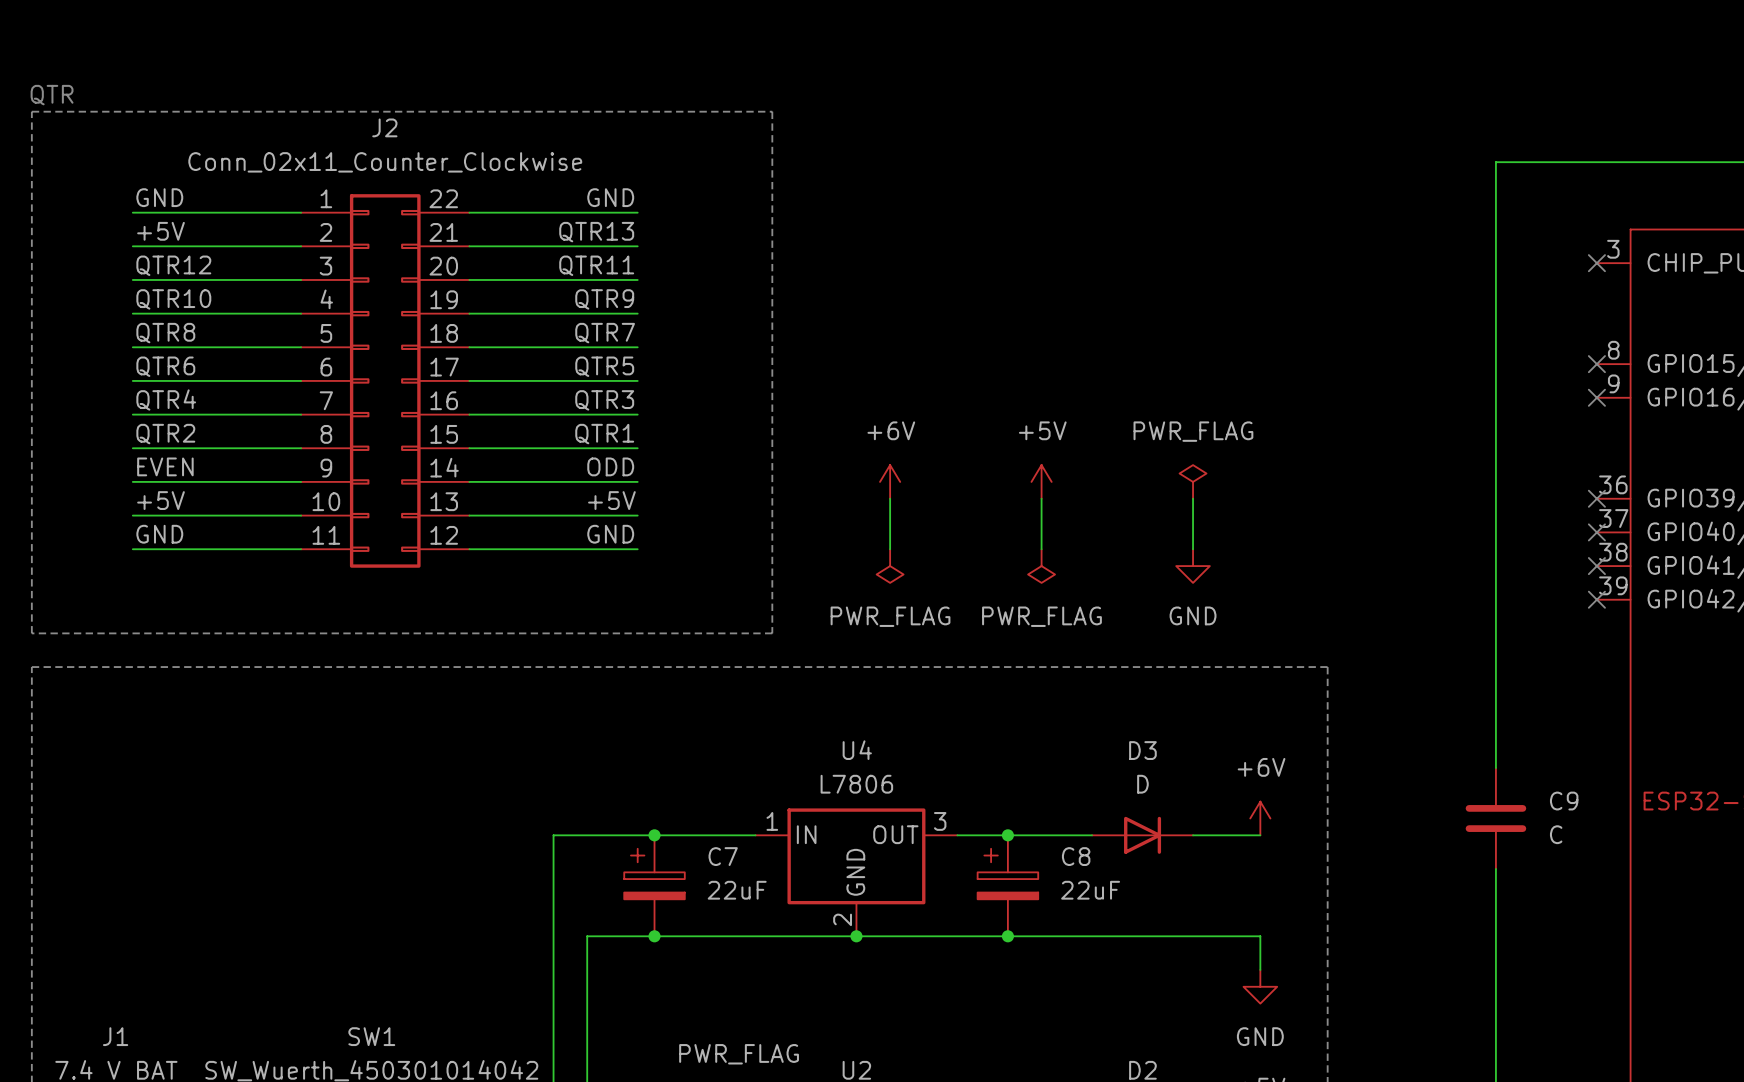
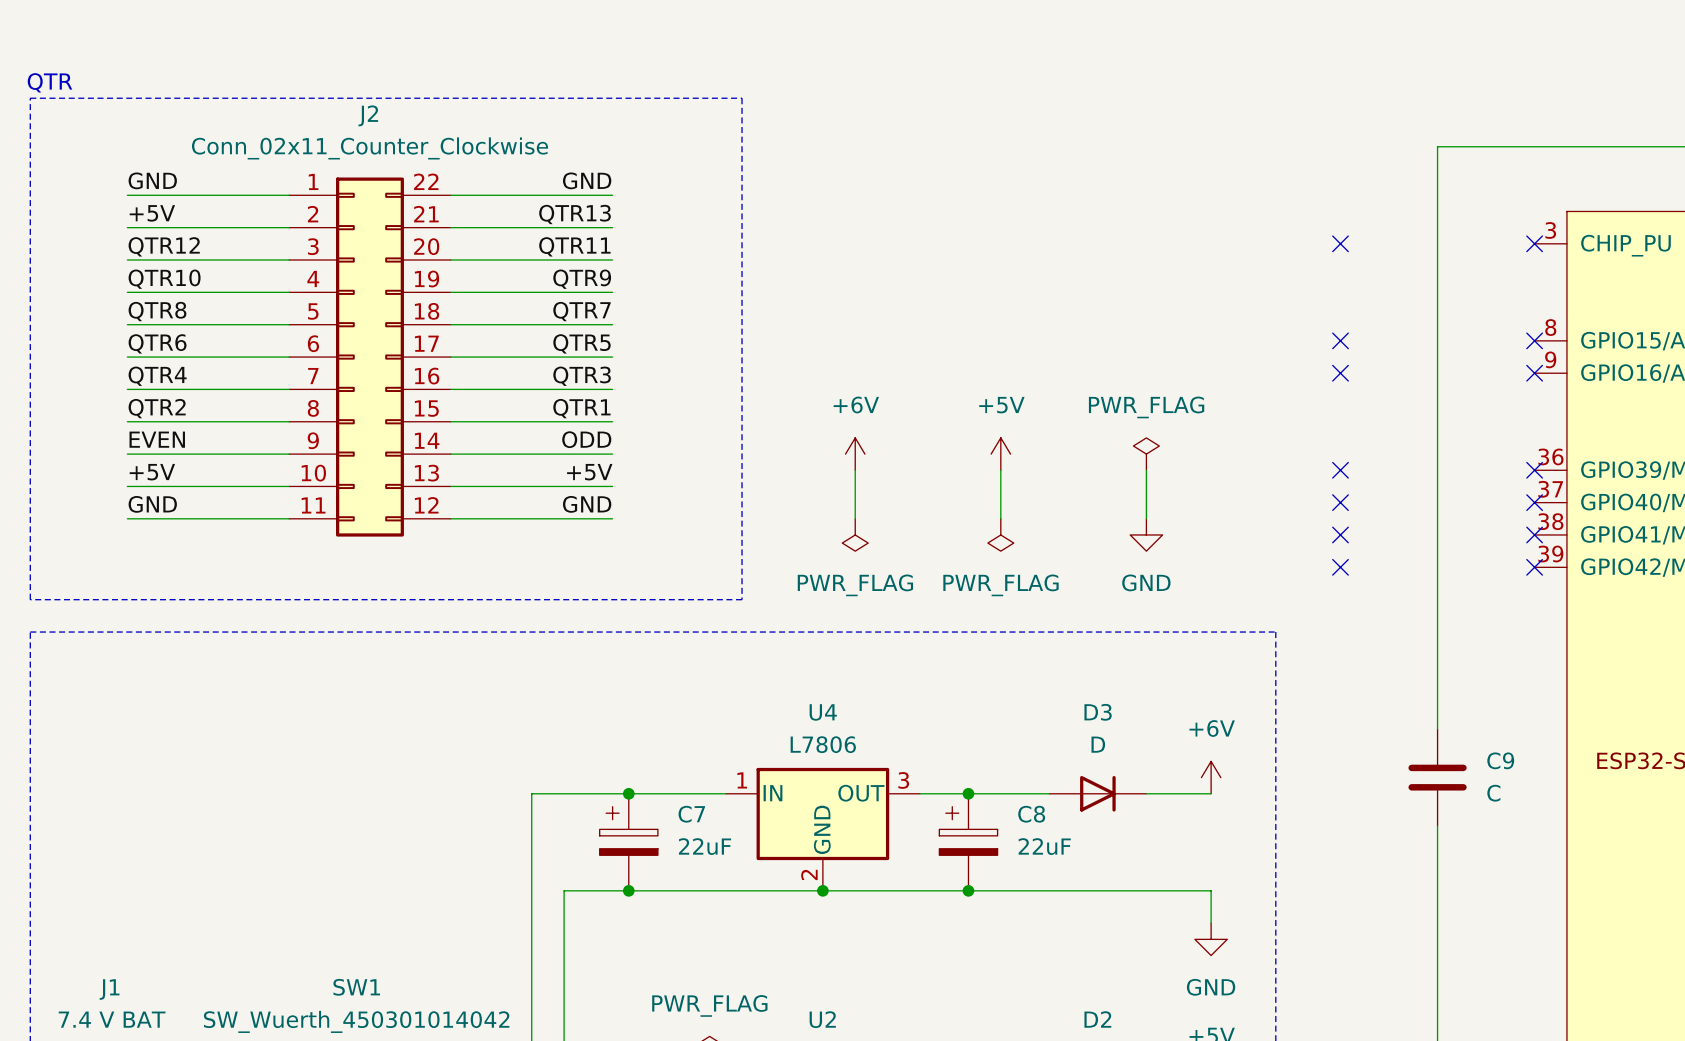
no-connect mark: none -> (1340, 243)
no-connect mark: none -> (1340, 340)
no-connect mark: none -> (1340, 373)
no-connect mark: none -> (1340, 470)
no-connect mark: none -> (1340, 502)
no-connect mark: none -> (1340, 534)
no-connect mark: none -> (1340, 567)

